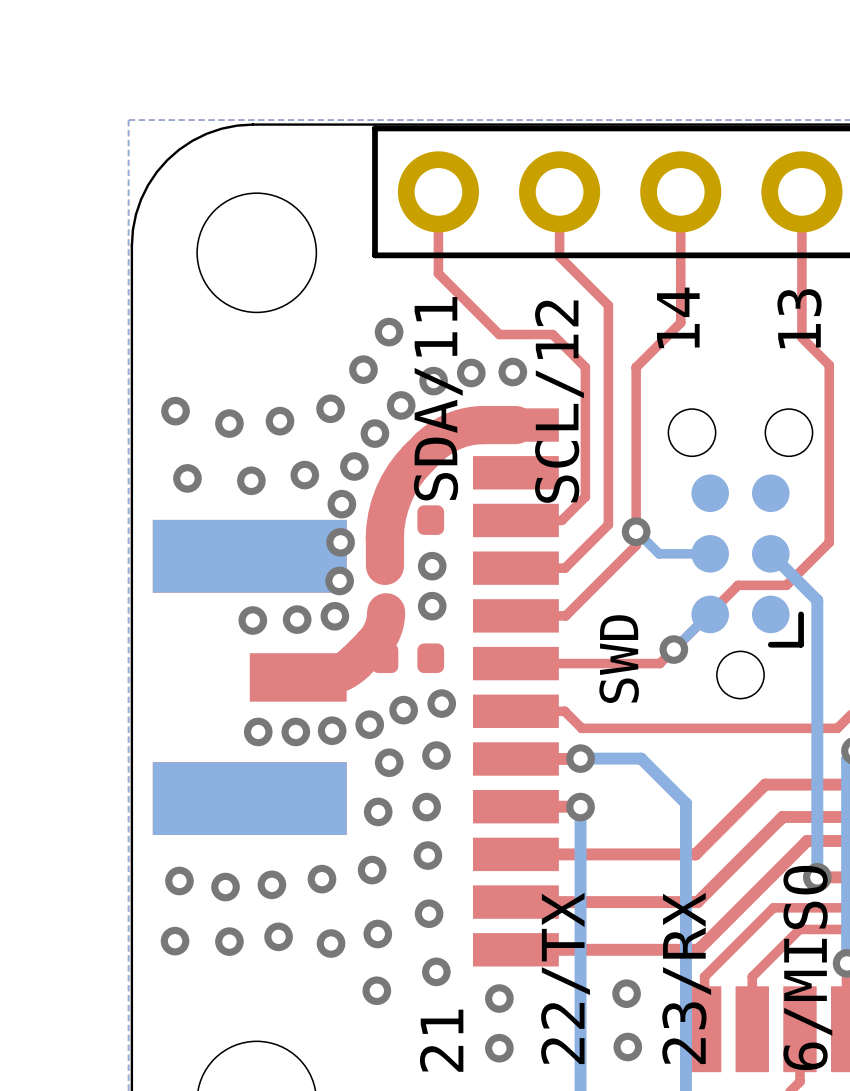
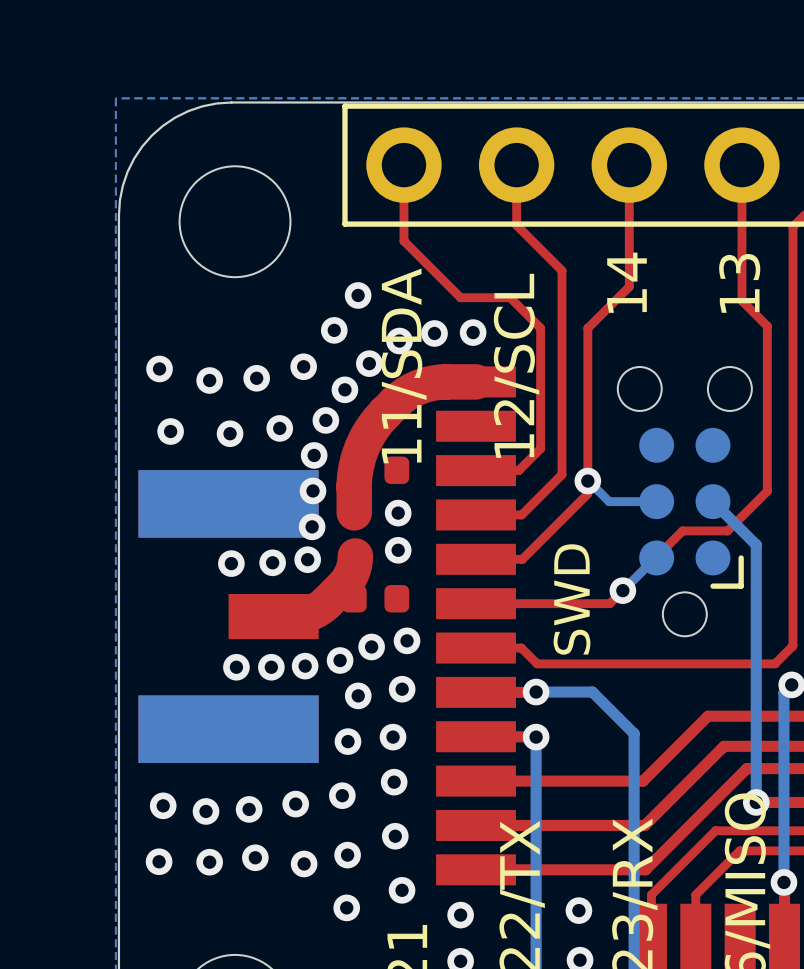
text: SDA/11 (438, 398) -> 11/SDA (403, 365)
text: SCL/12 (559, 401) -> 12/SCL (516, 365)

